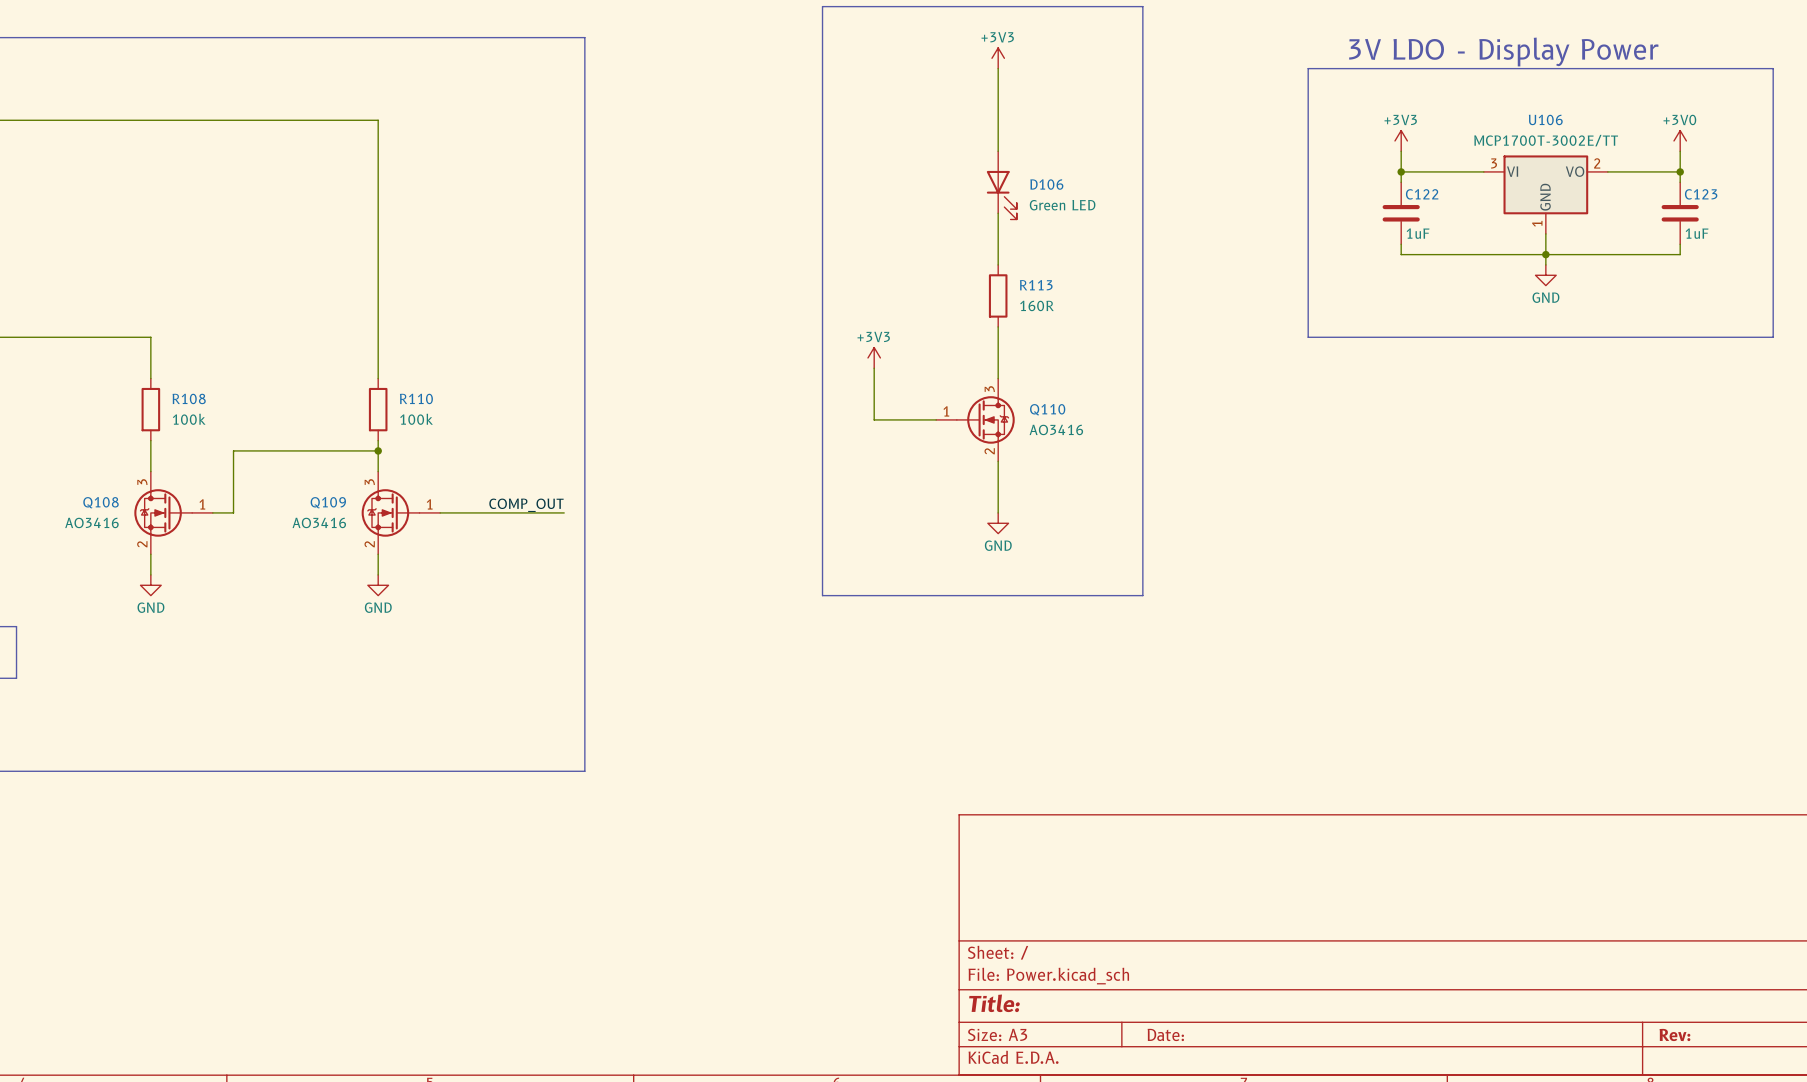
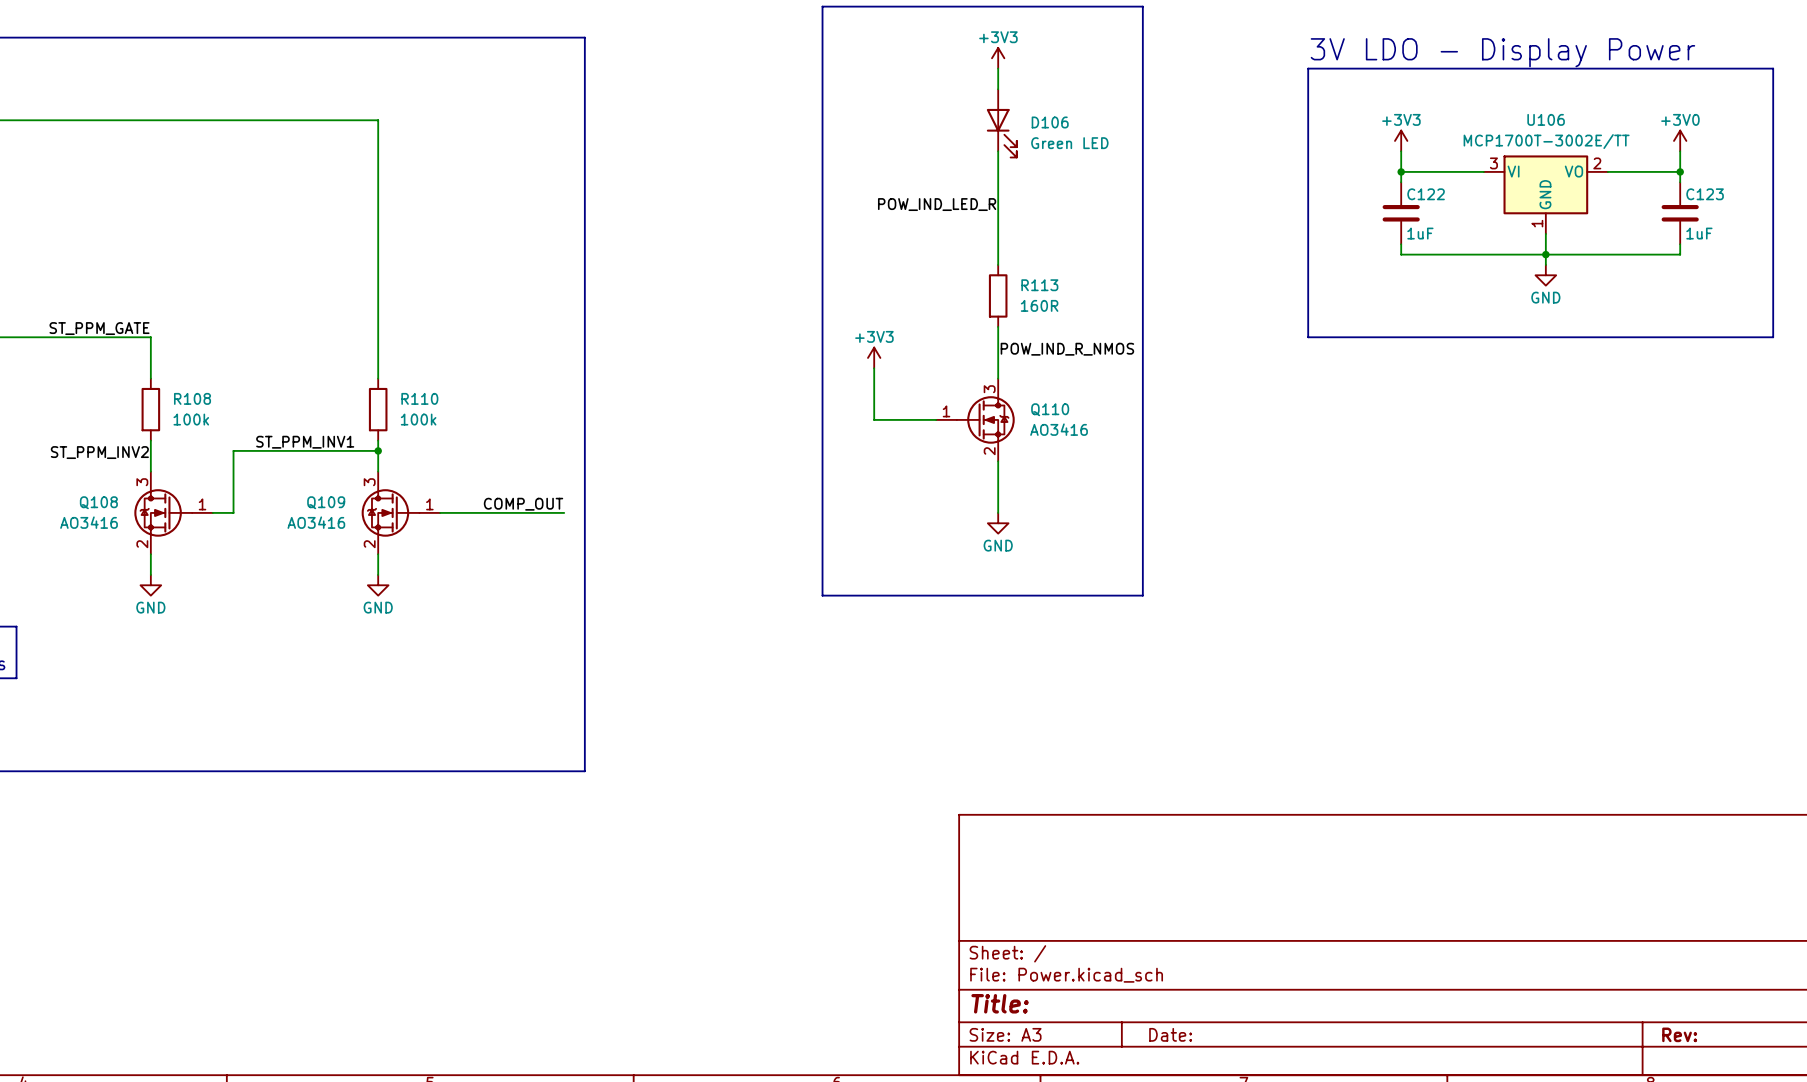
D106 position: (1001, 185) -> (1001, 123)
label: none -> POW_IND_LED_R (937, 204)
label: none -> ST_PPM_GATE (99, 328)
label: none -> POW_IND_R_NMOS (1067, 349)
label: none -> ST_PPM_INV1 (305, 442)
label: none -> ST_PPM_INV2 (99, 452)

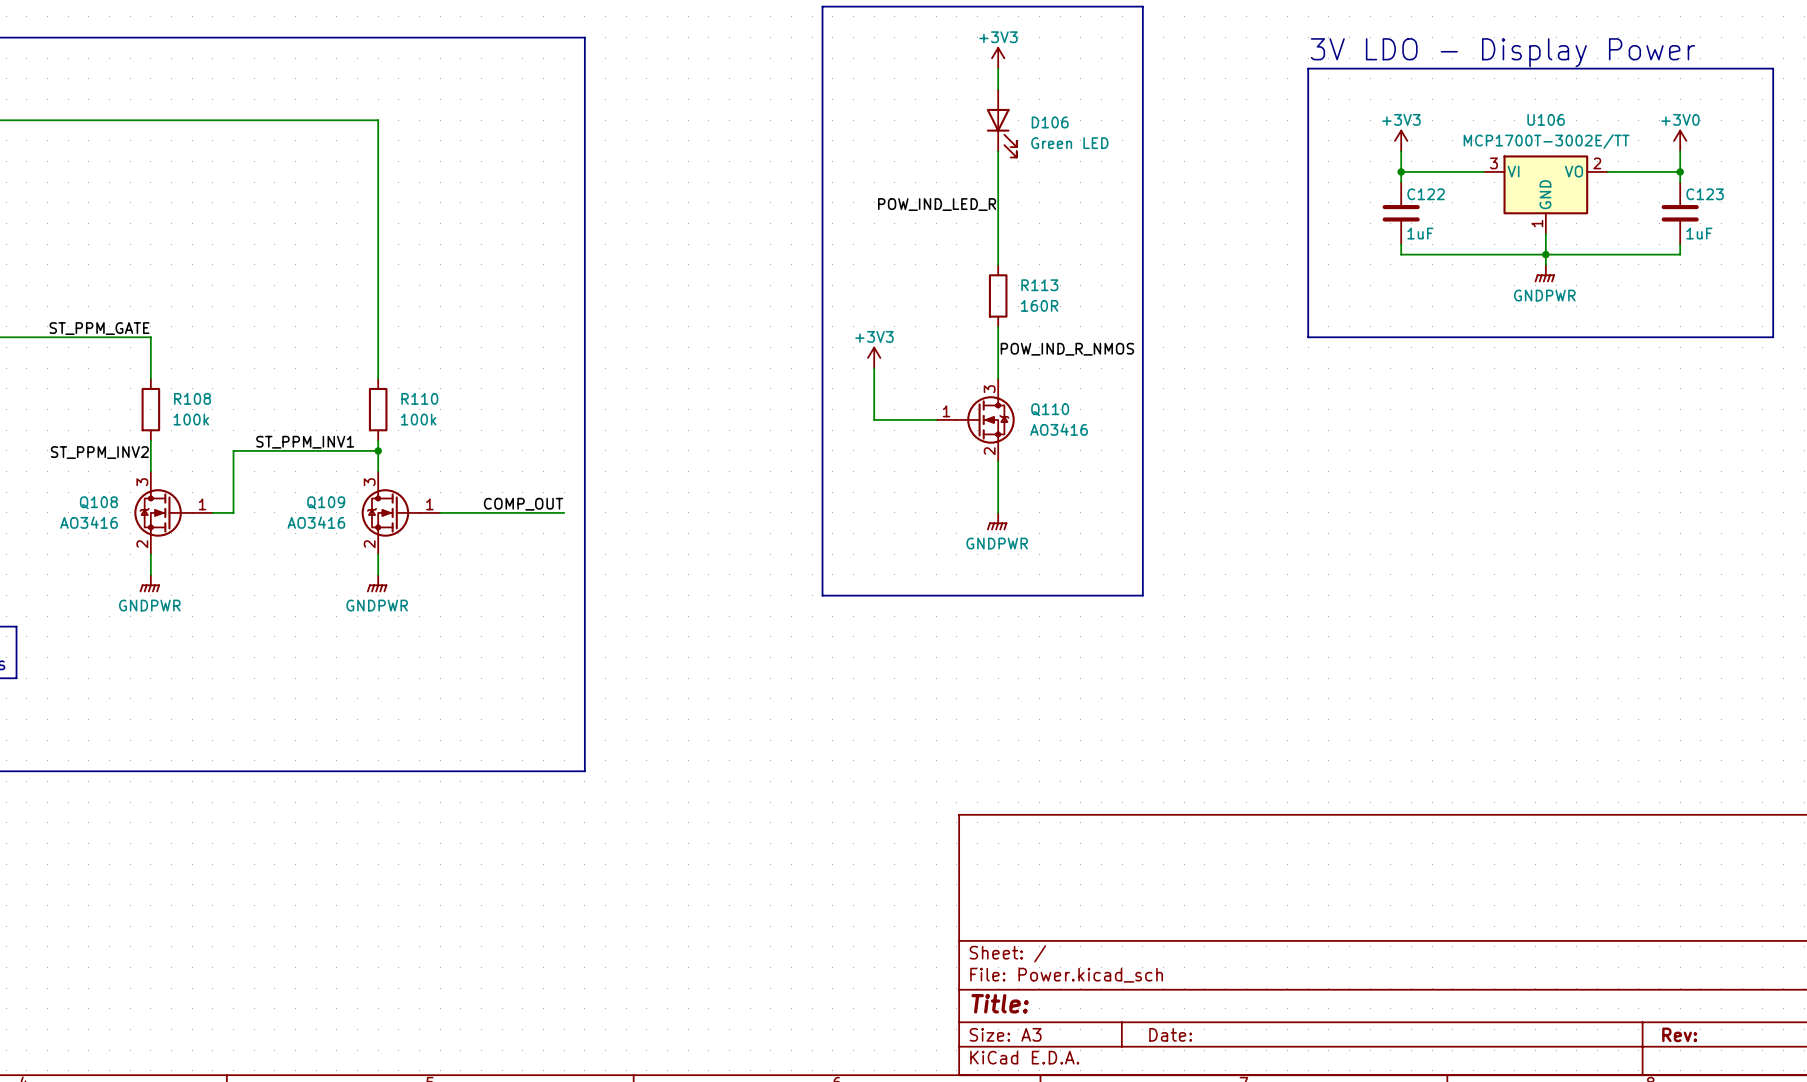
power symbol: GND (1545, 275) -> GNDPWR (1544, 273)
power symbol: GND (998, 523) -> GNDPWR (997, 521)
power symbol: GND (150, 585) -> GNDPWR (149, 583)
power symbol: GND (378, 585) -> GNDPWR (377, 583)

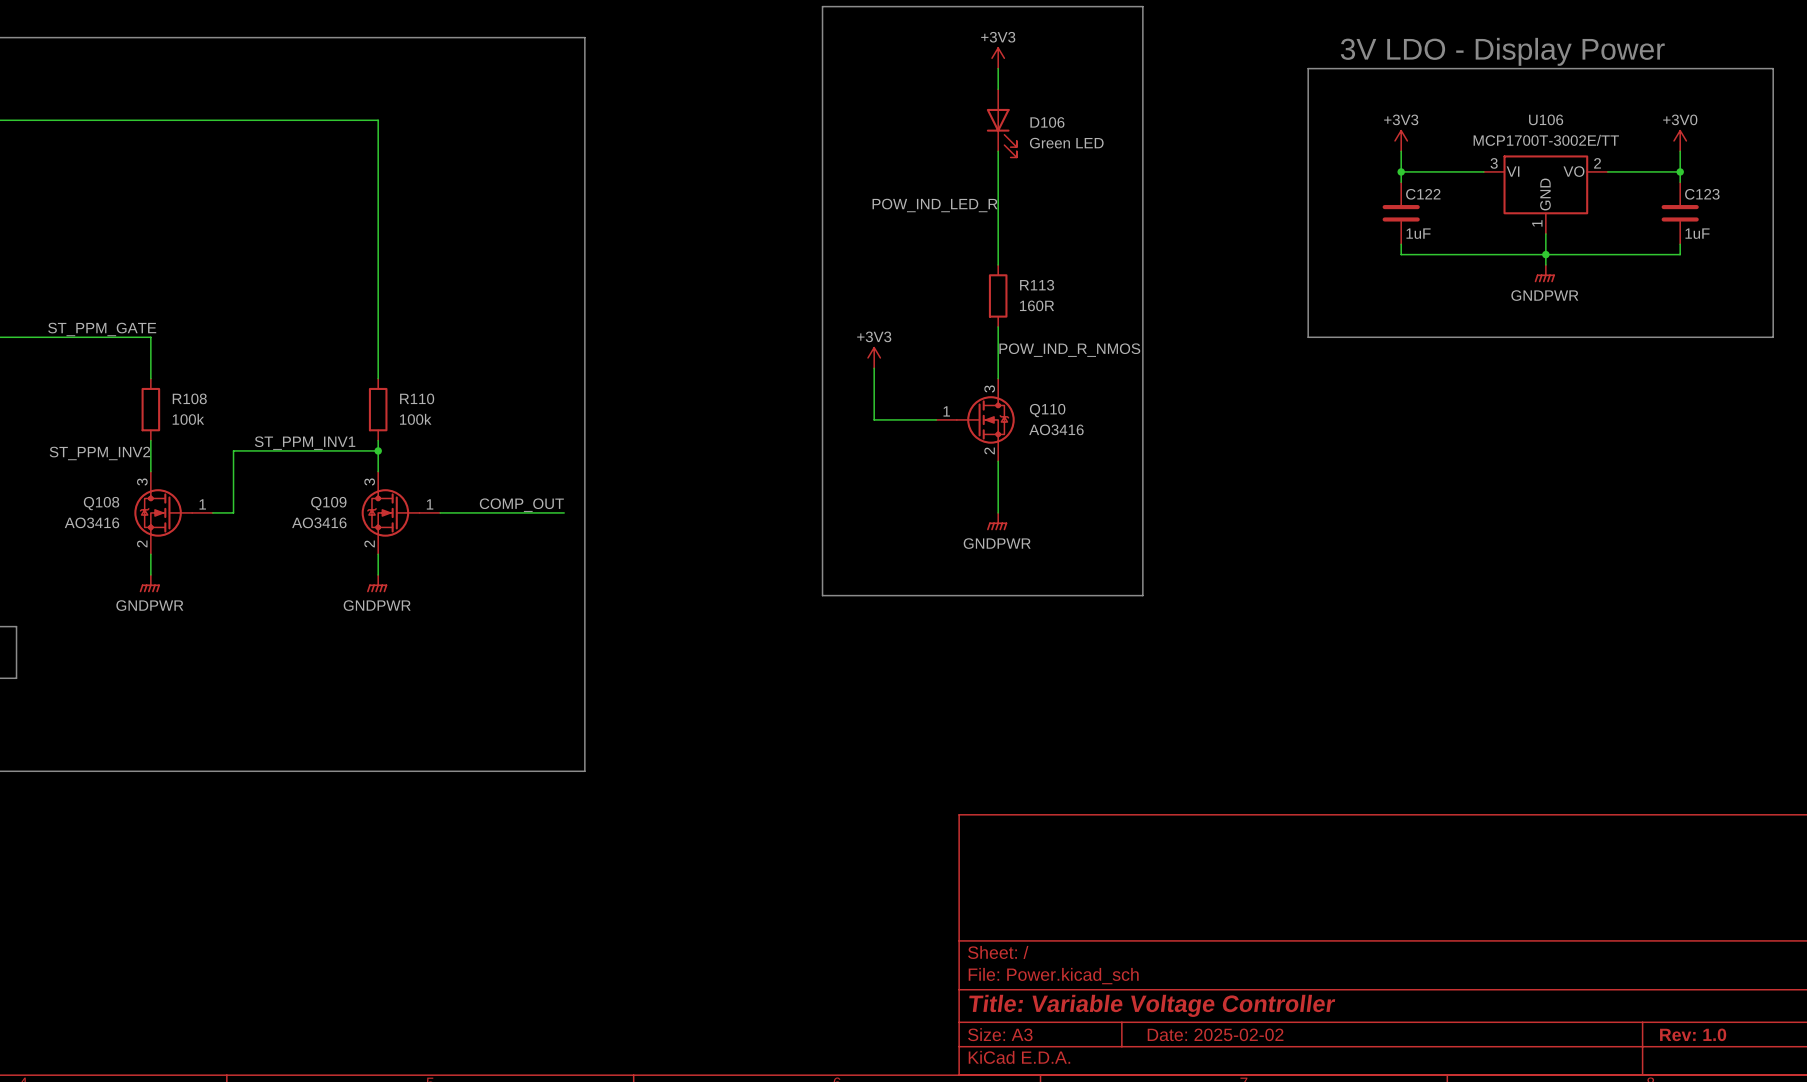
title block: Title: (1000, 1003) -> Title: Variable Voltage Controller (1152, 1005)
title block: Date: (1170, 1034) -> Date: 2025-02-02 (1215, 1034)
title block: Rev: (1679, 1034) -> Rev: 1.0 (1693, 1034)

